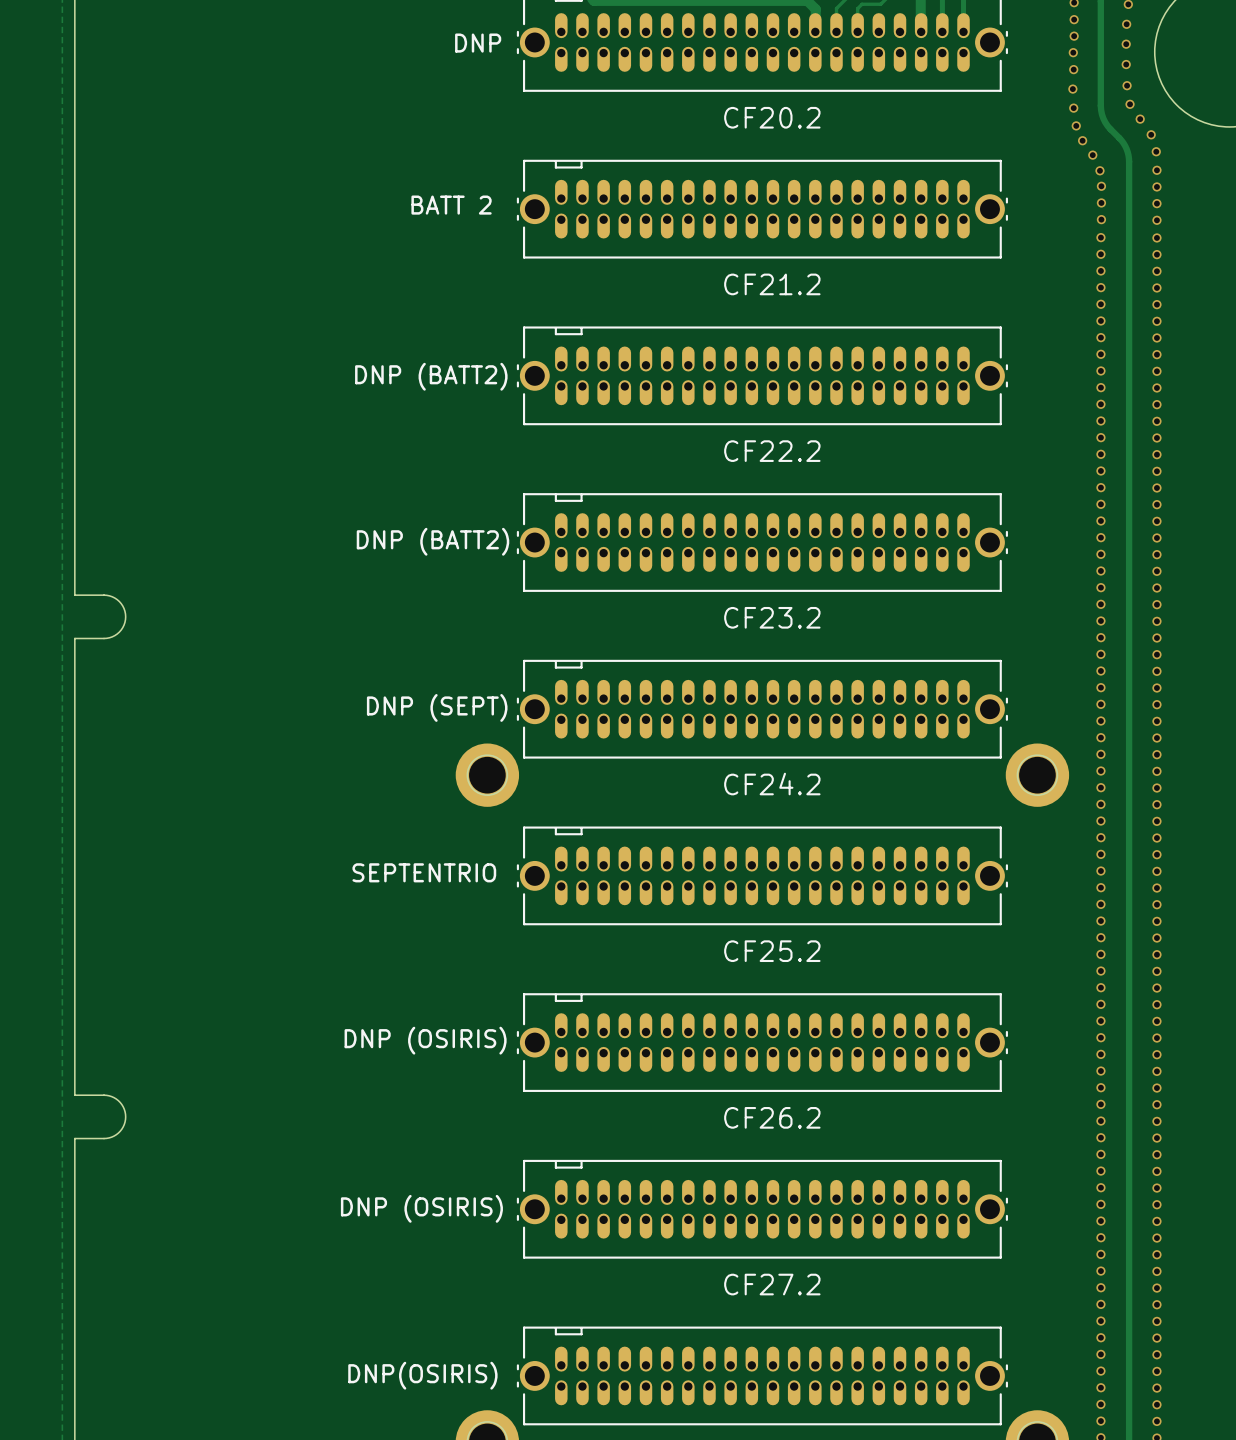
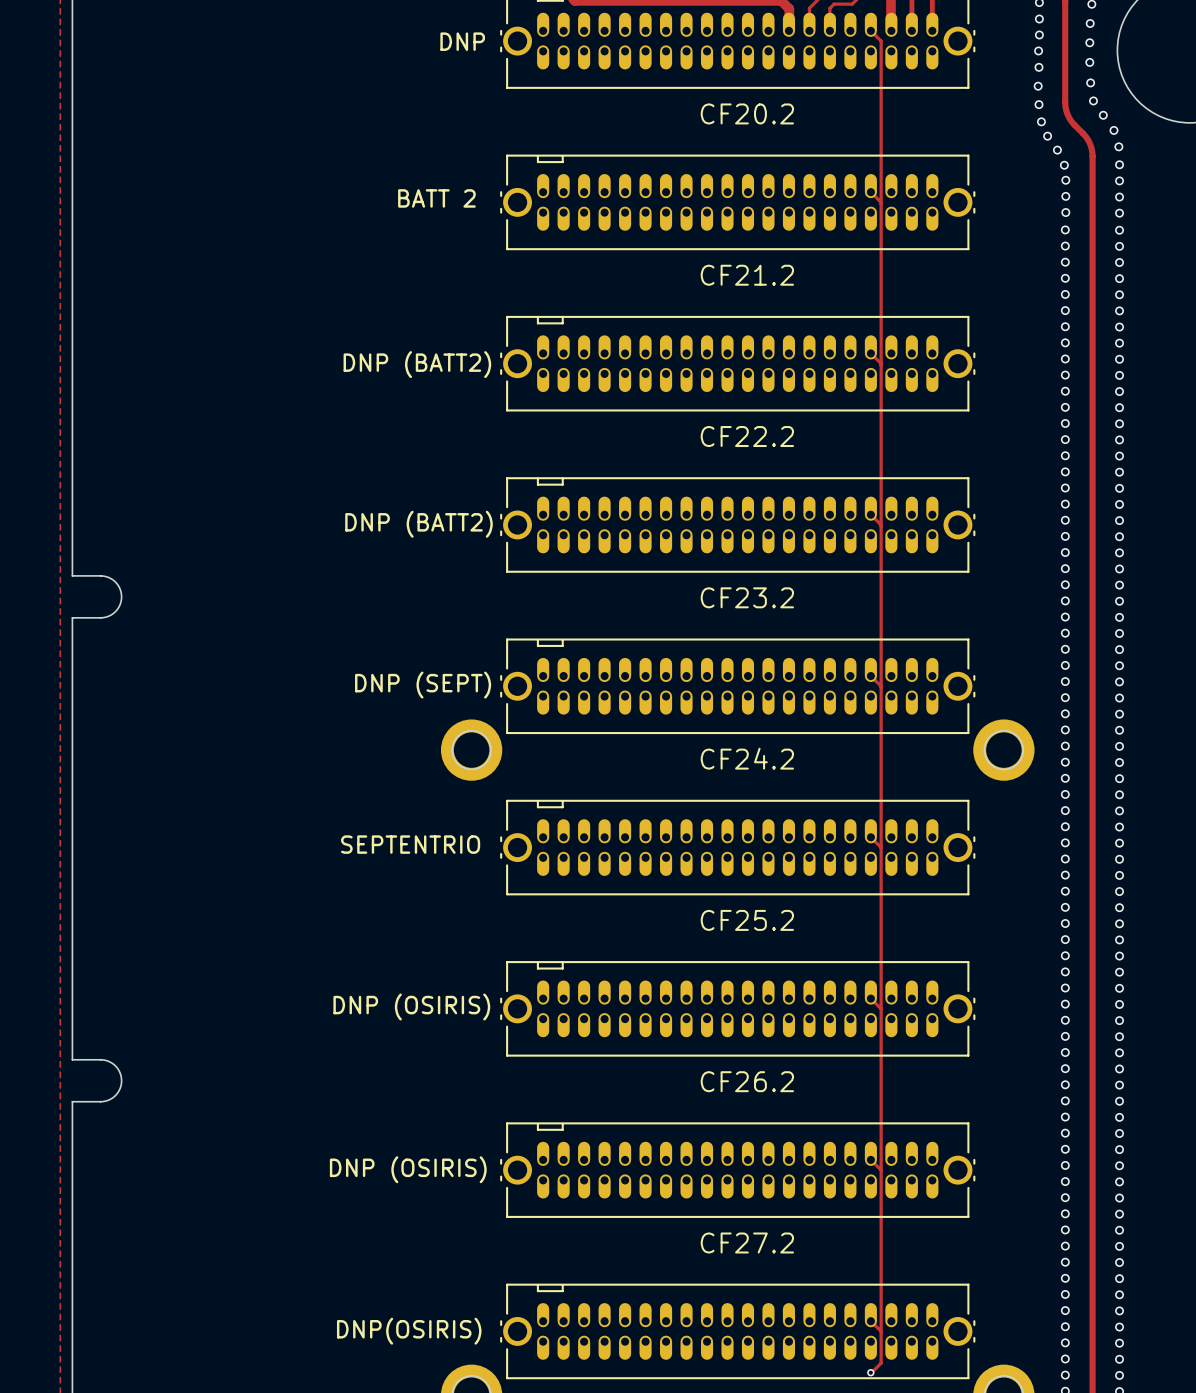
track: none -> (870, 30) (881, 41) (881, 1363) (870, 1372)
track: none -> (870, 192) (881, 202)
track: none -> (870, 353) (881, 363)
track: none -> (870, 514) (881, 524)
track: none -> (870, 676) (881, 686)
track: none -> (870, 837) (881, 847)
track: none -> (870, 998) (881, 1008)
track: none -> (870, 1159) (881, 1170)
track: none -> (870, 1321) (881, 1331)
via: none -> (870, 1372)

